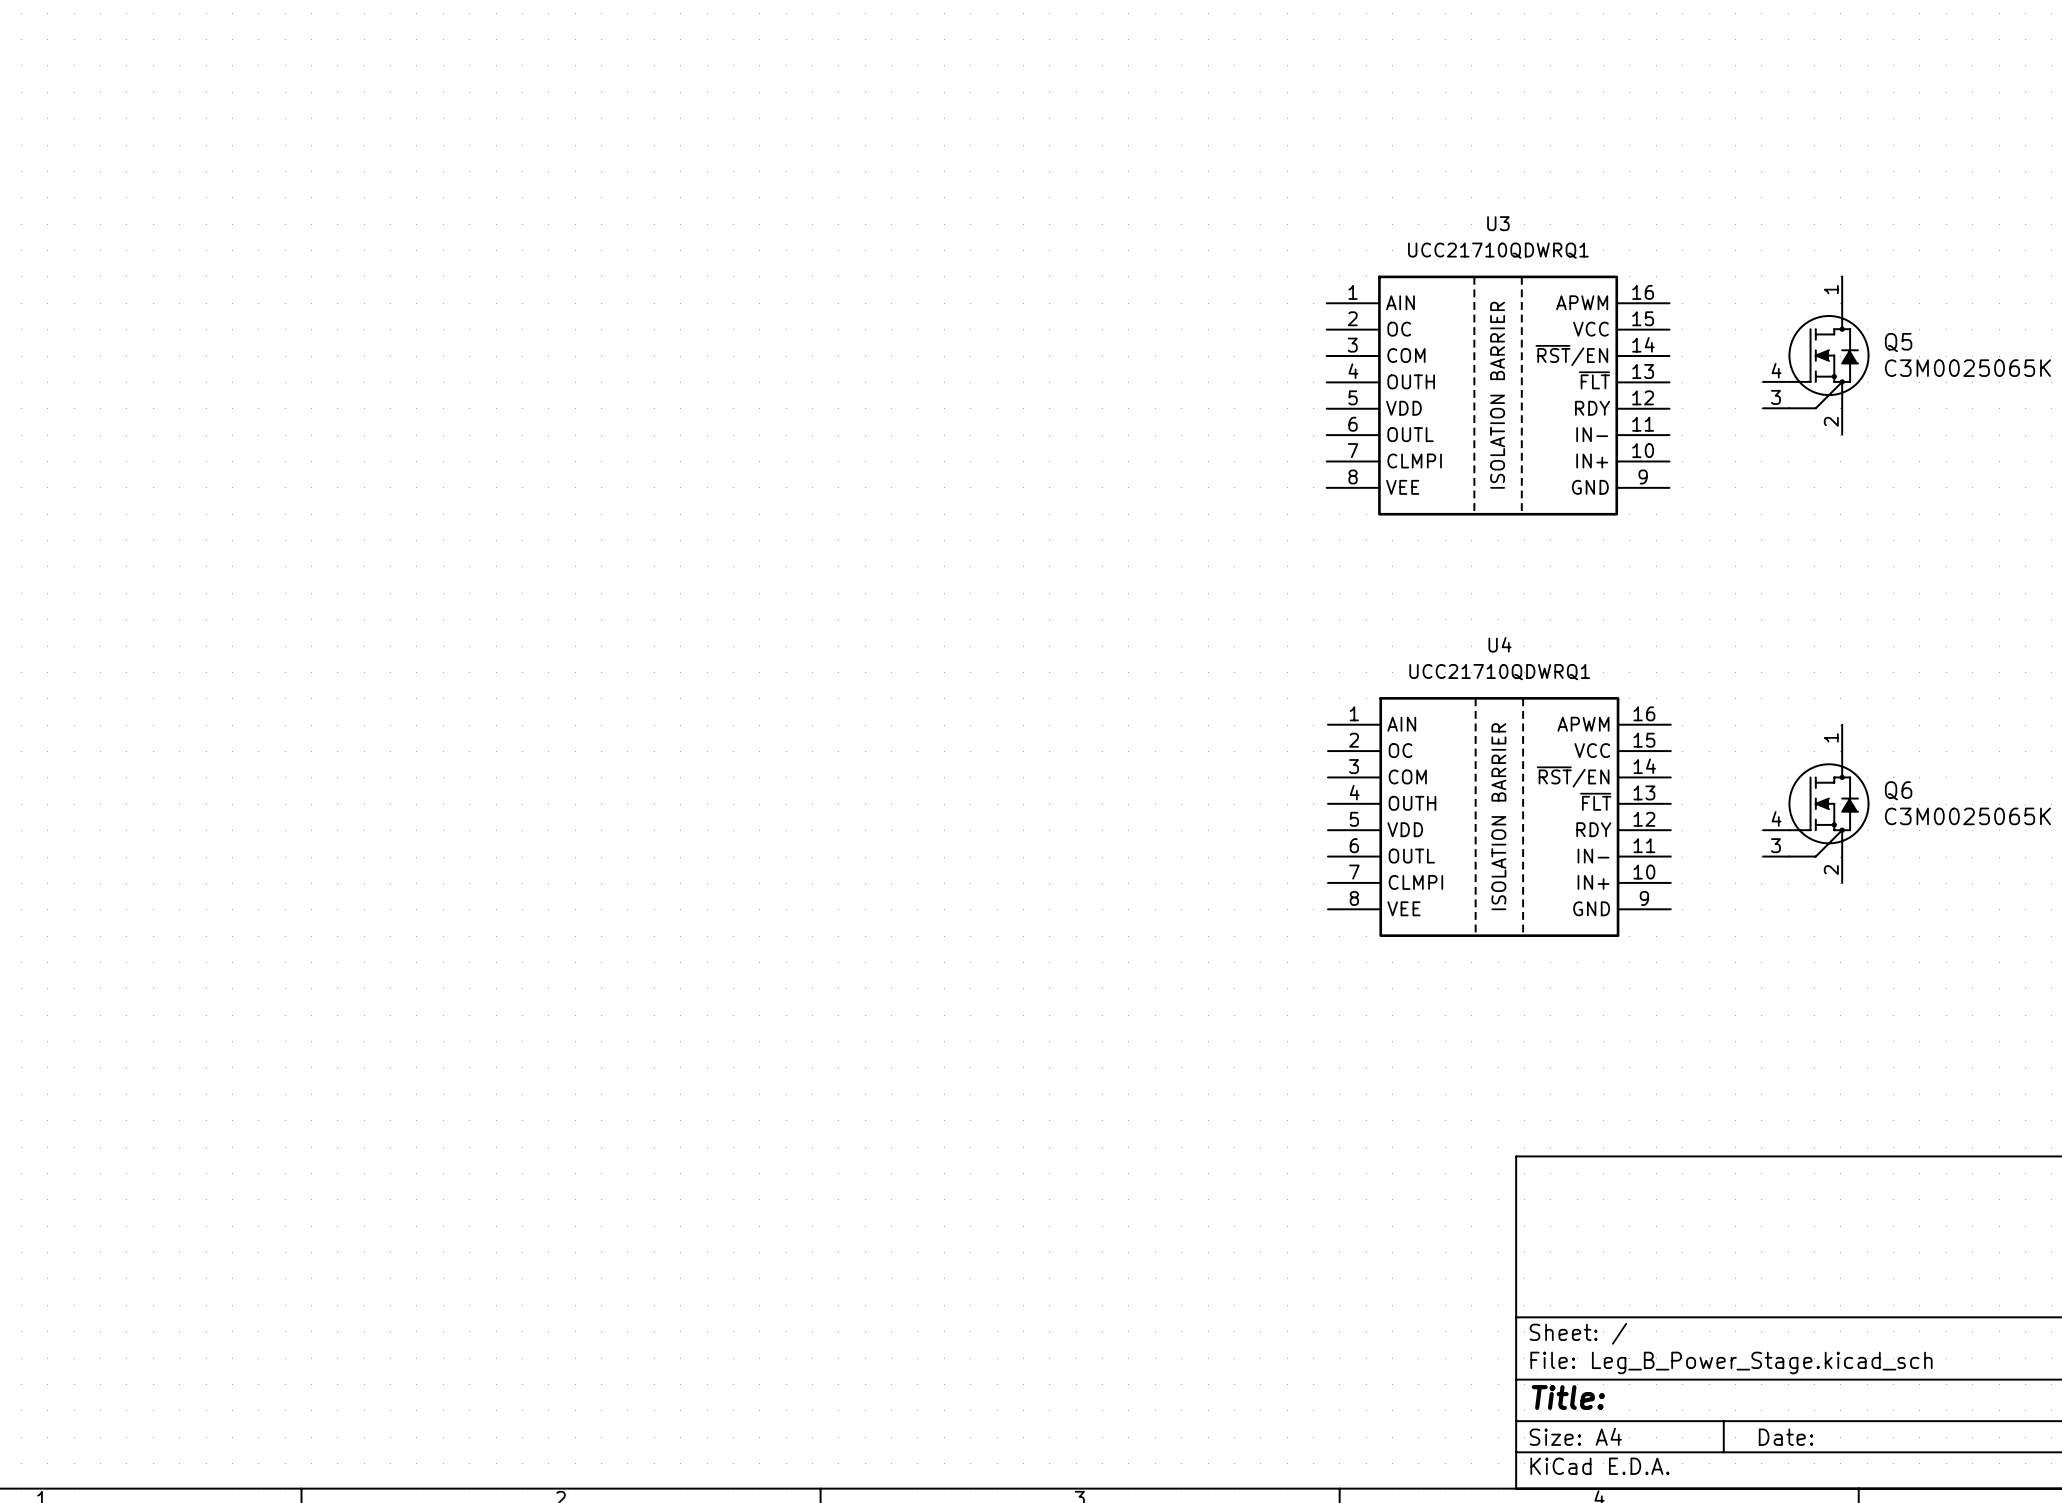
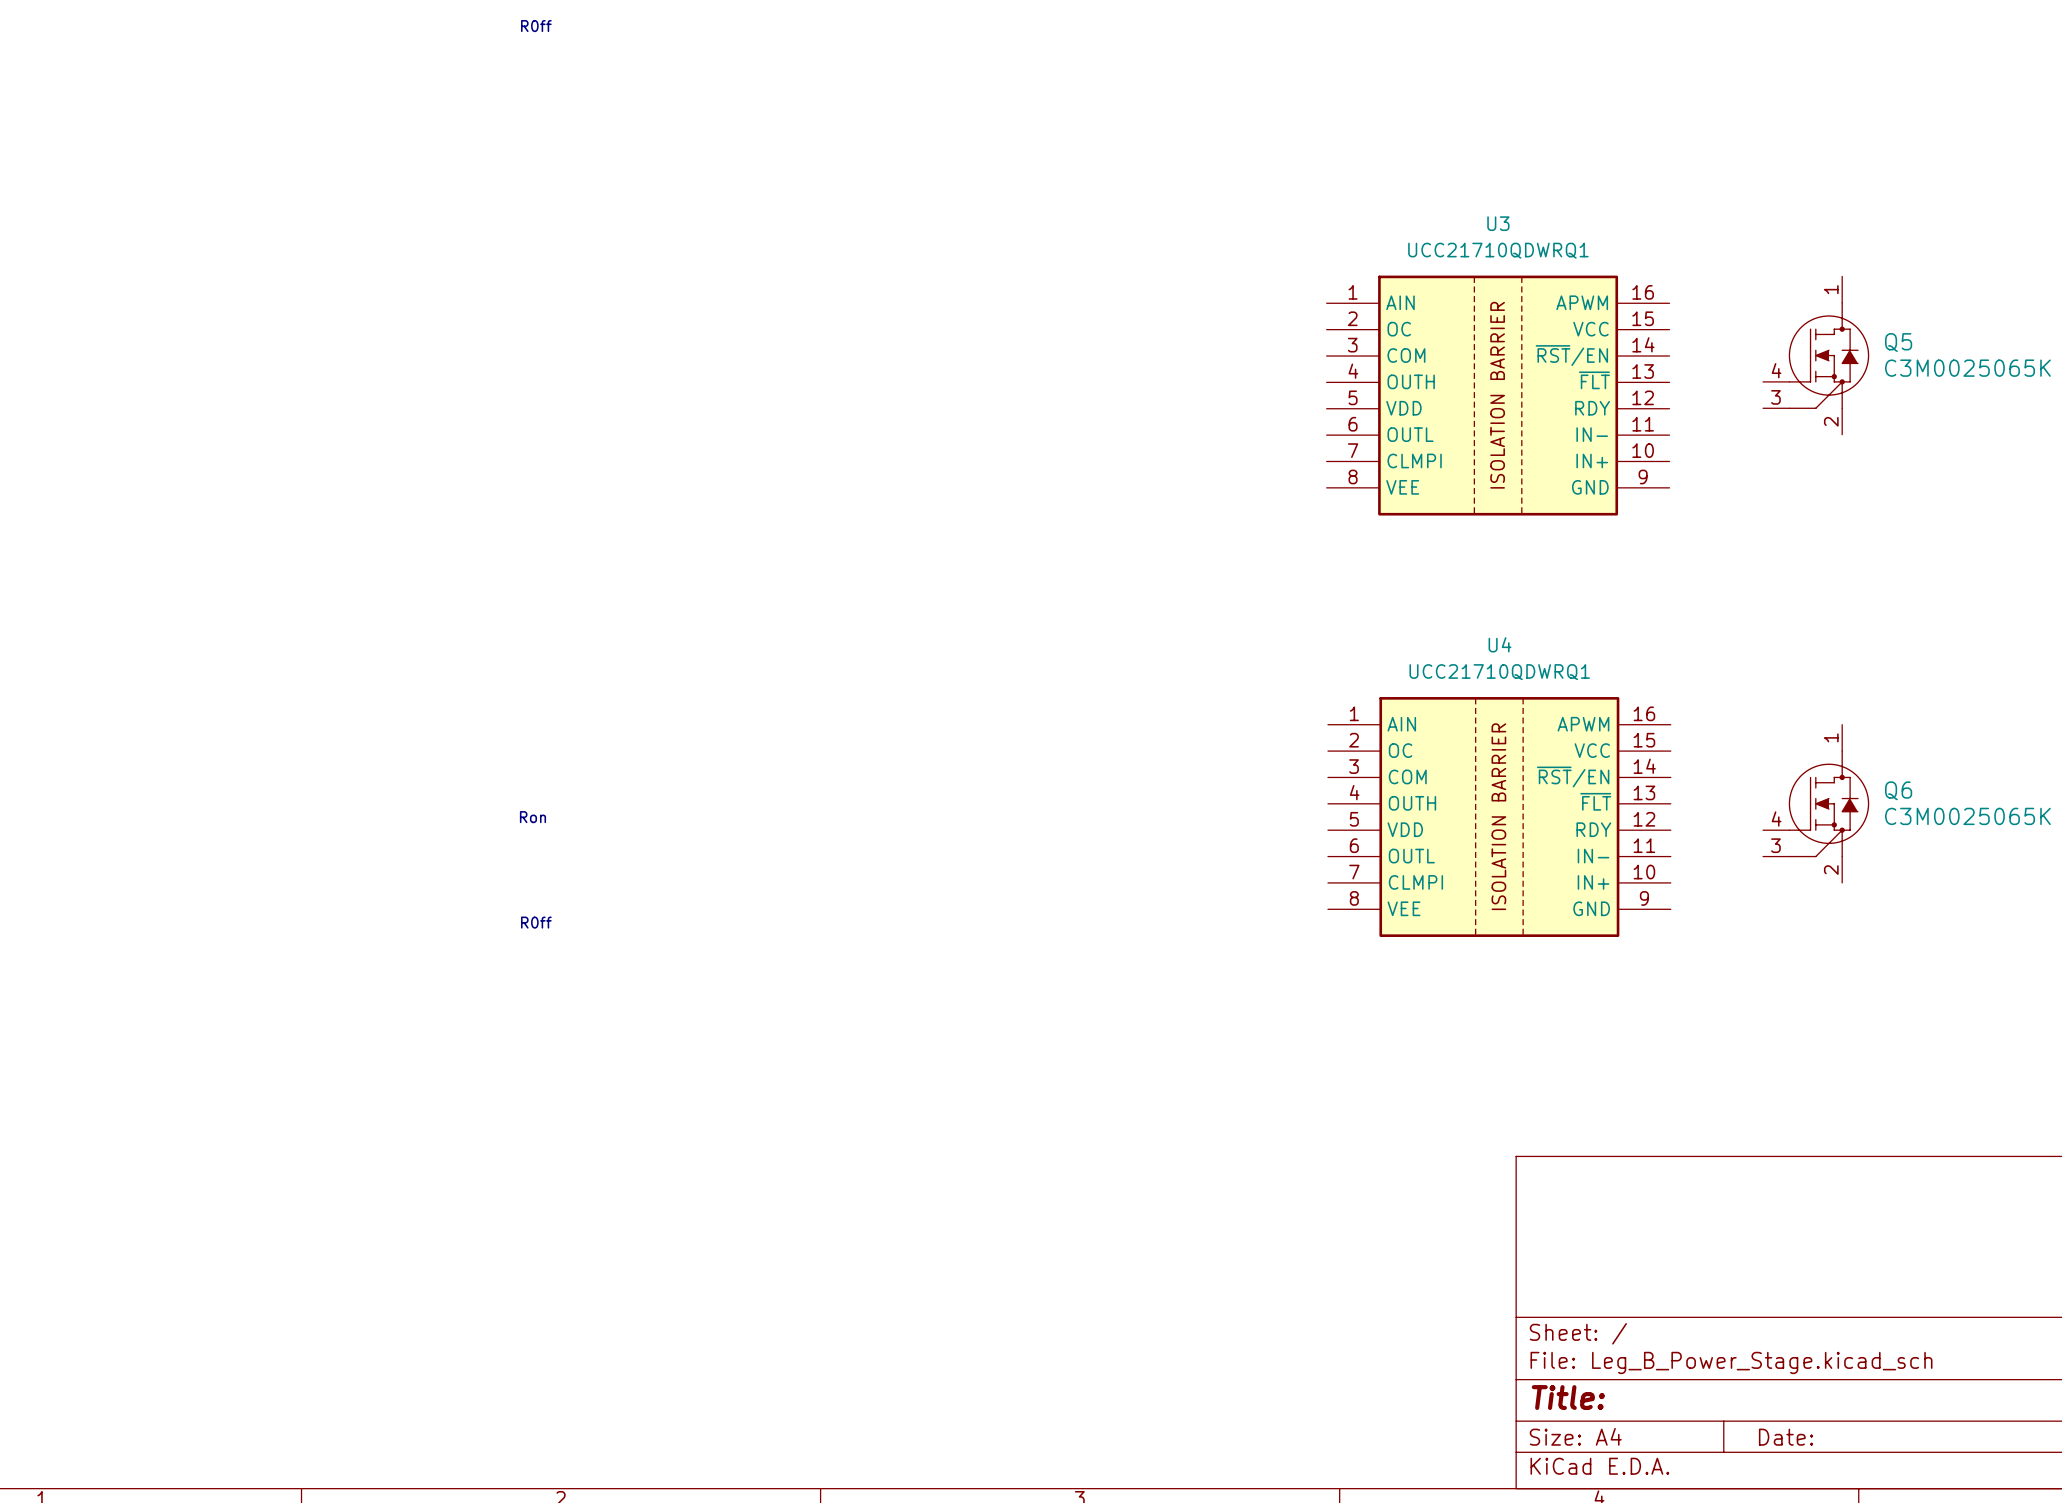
text: none -> R0ff (536, 26)
text: none -> Ron (532, 817)
text: none -> R0ff (536, 922)

